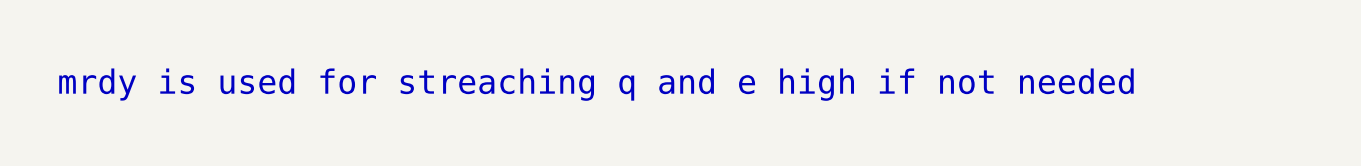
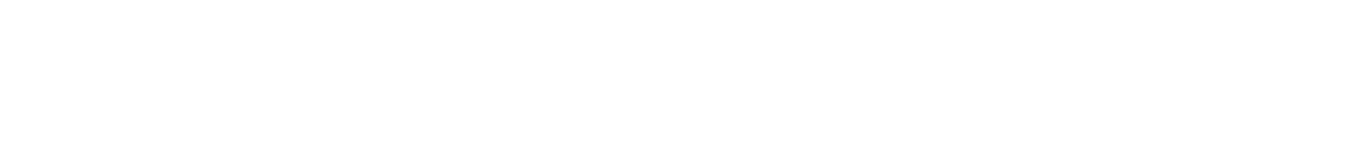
text: mrdy is used for streaching q and e high if not needed (596, 84) -> none

